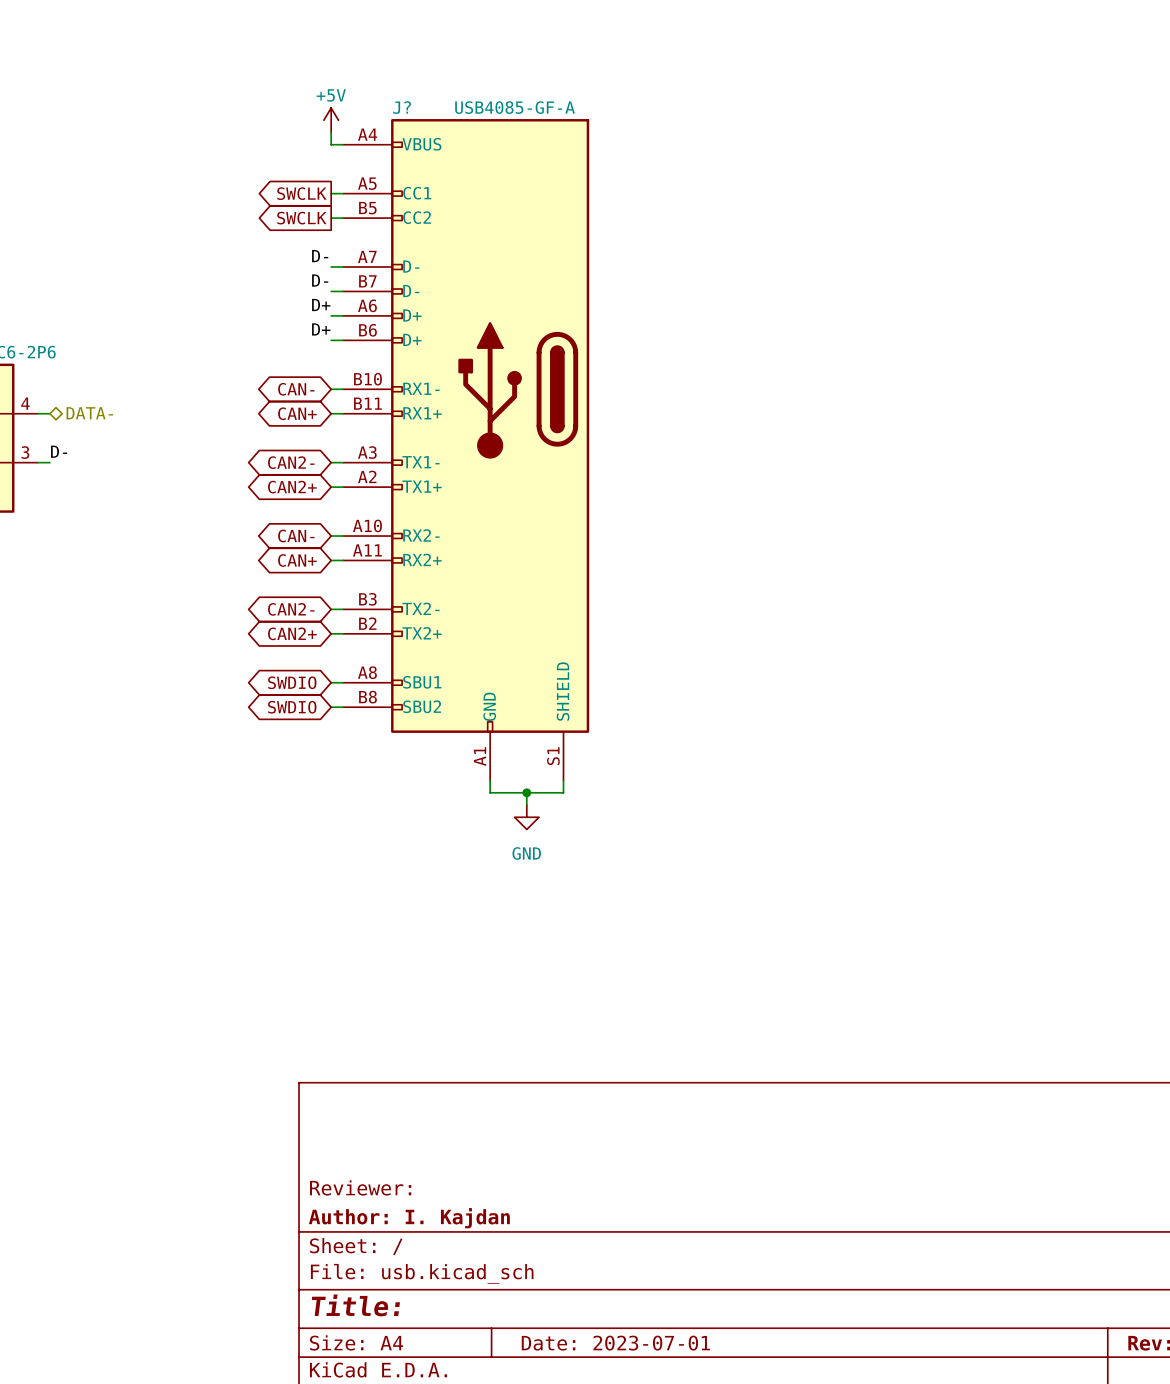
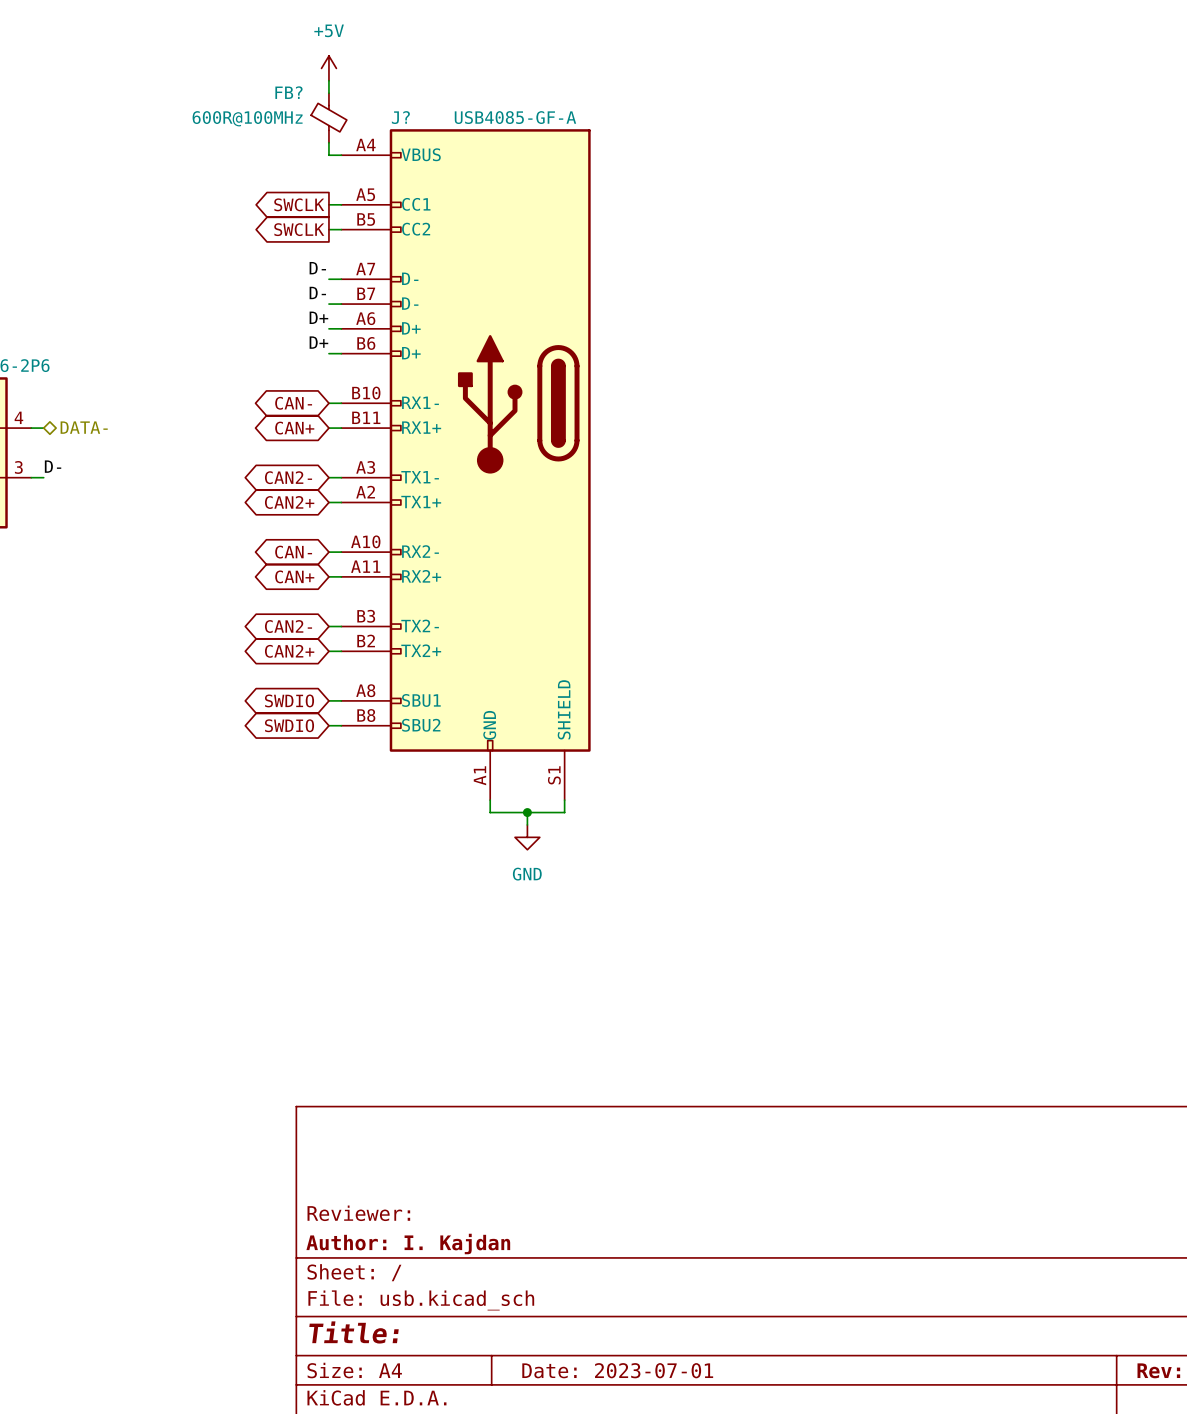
wire: none -> (328, 80) (328, 93)
power symbol text position: +5V (331, 95) -> +5V (329, 30)
FB?: none -> 600R@100MHz (328, 118)
power symbol position: +5V (331, 120) -> +5V (328, 68)

